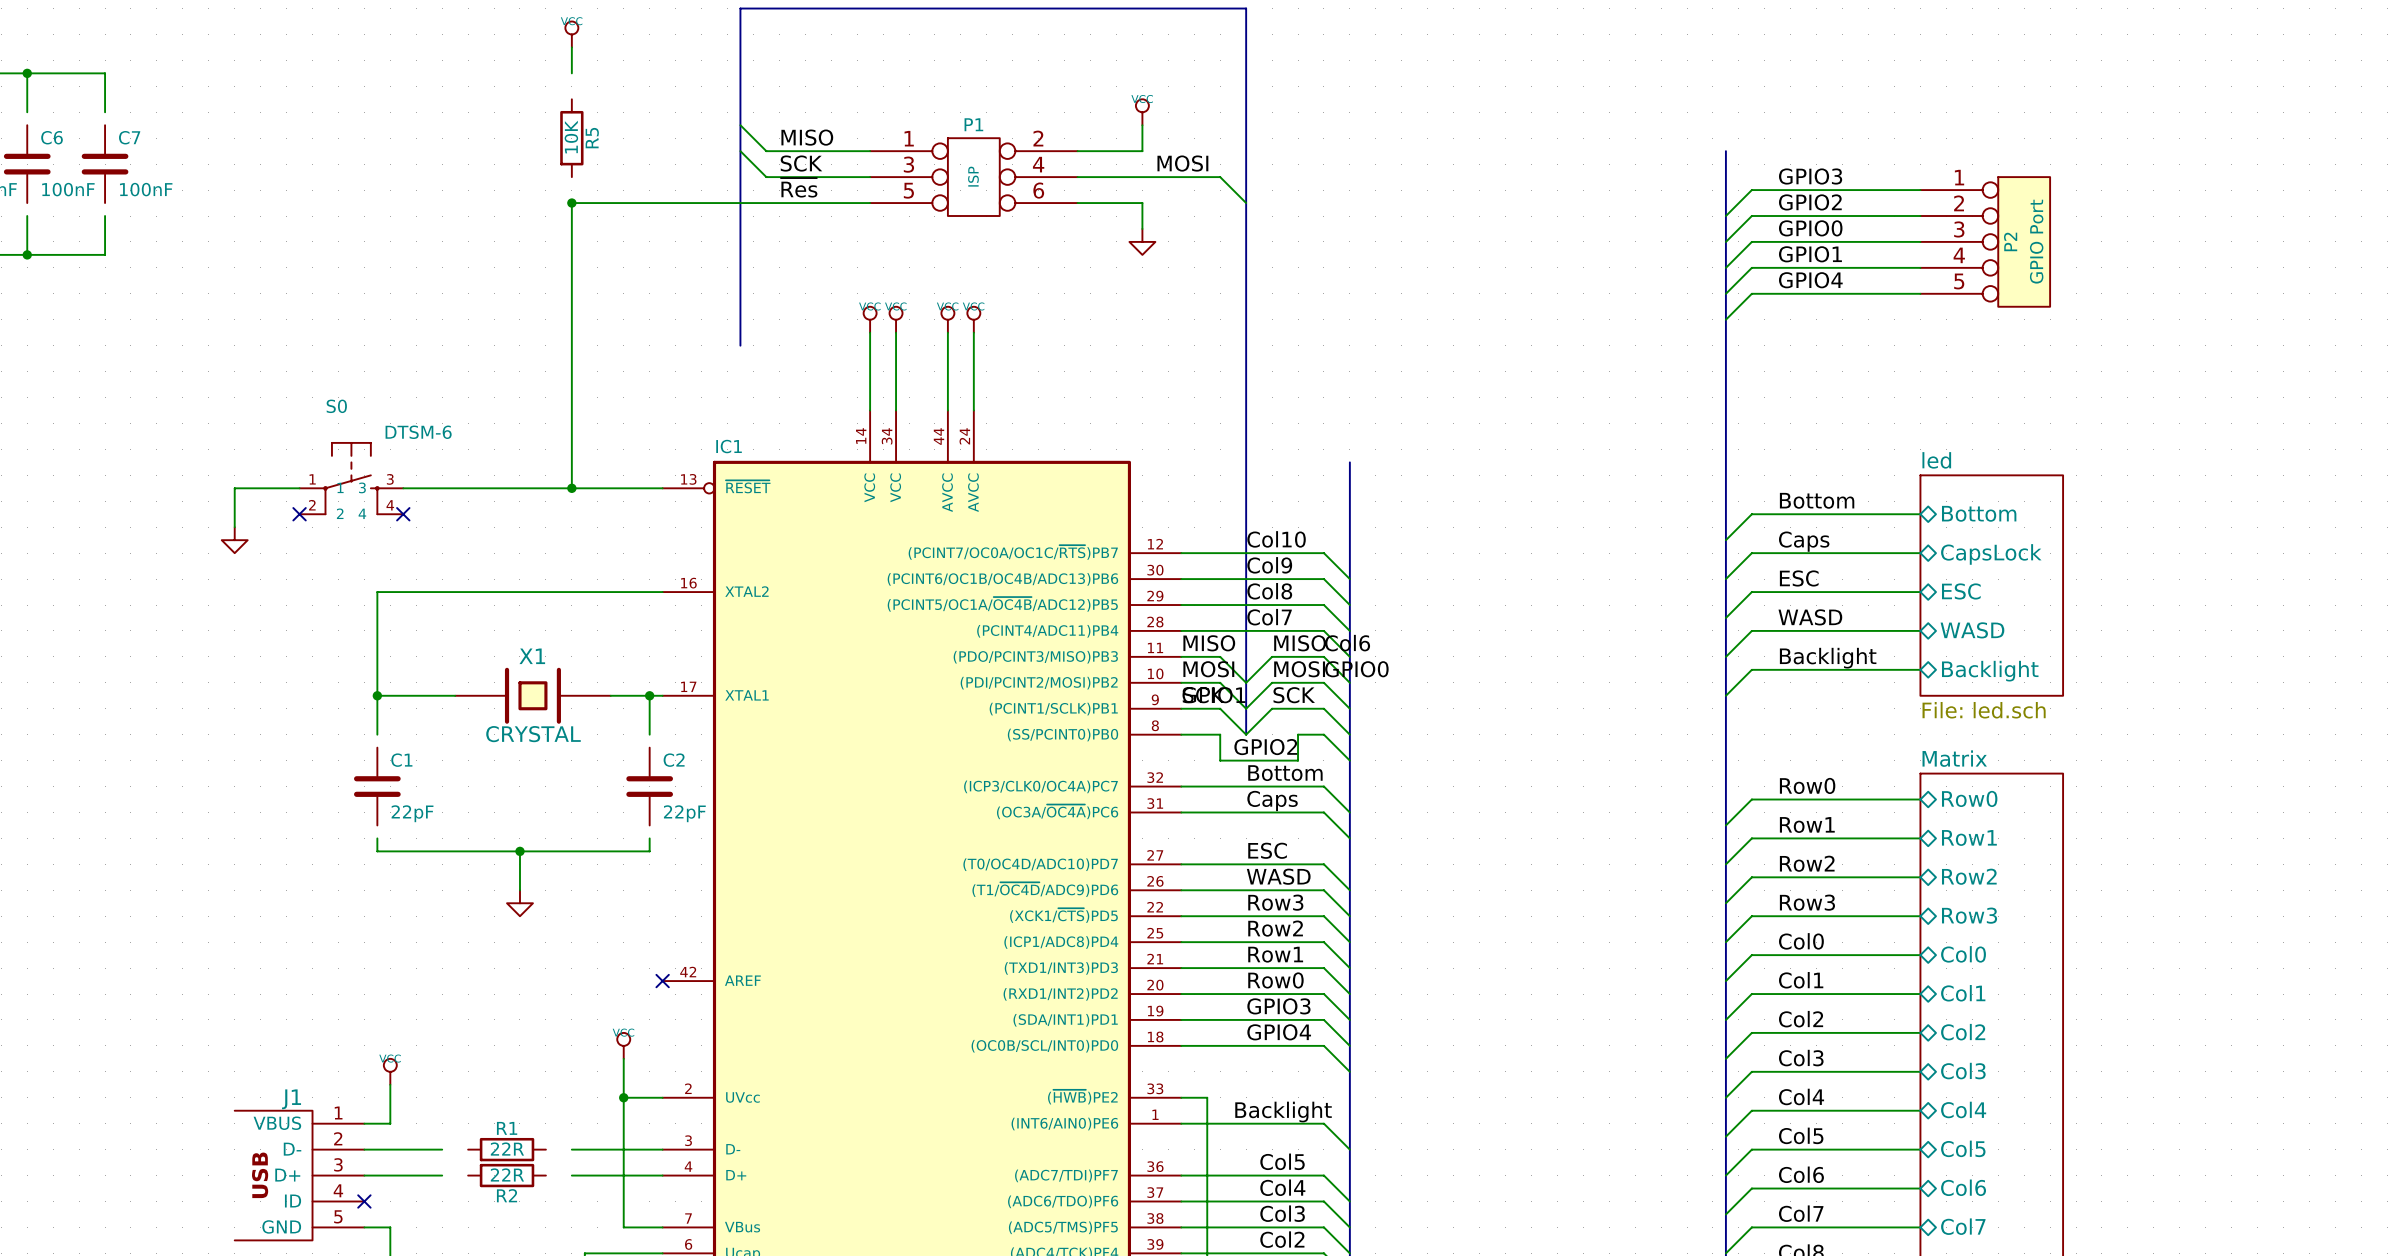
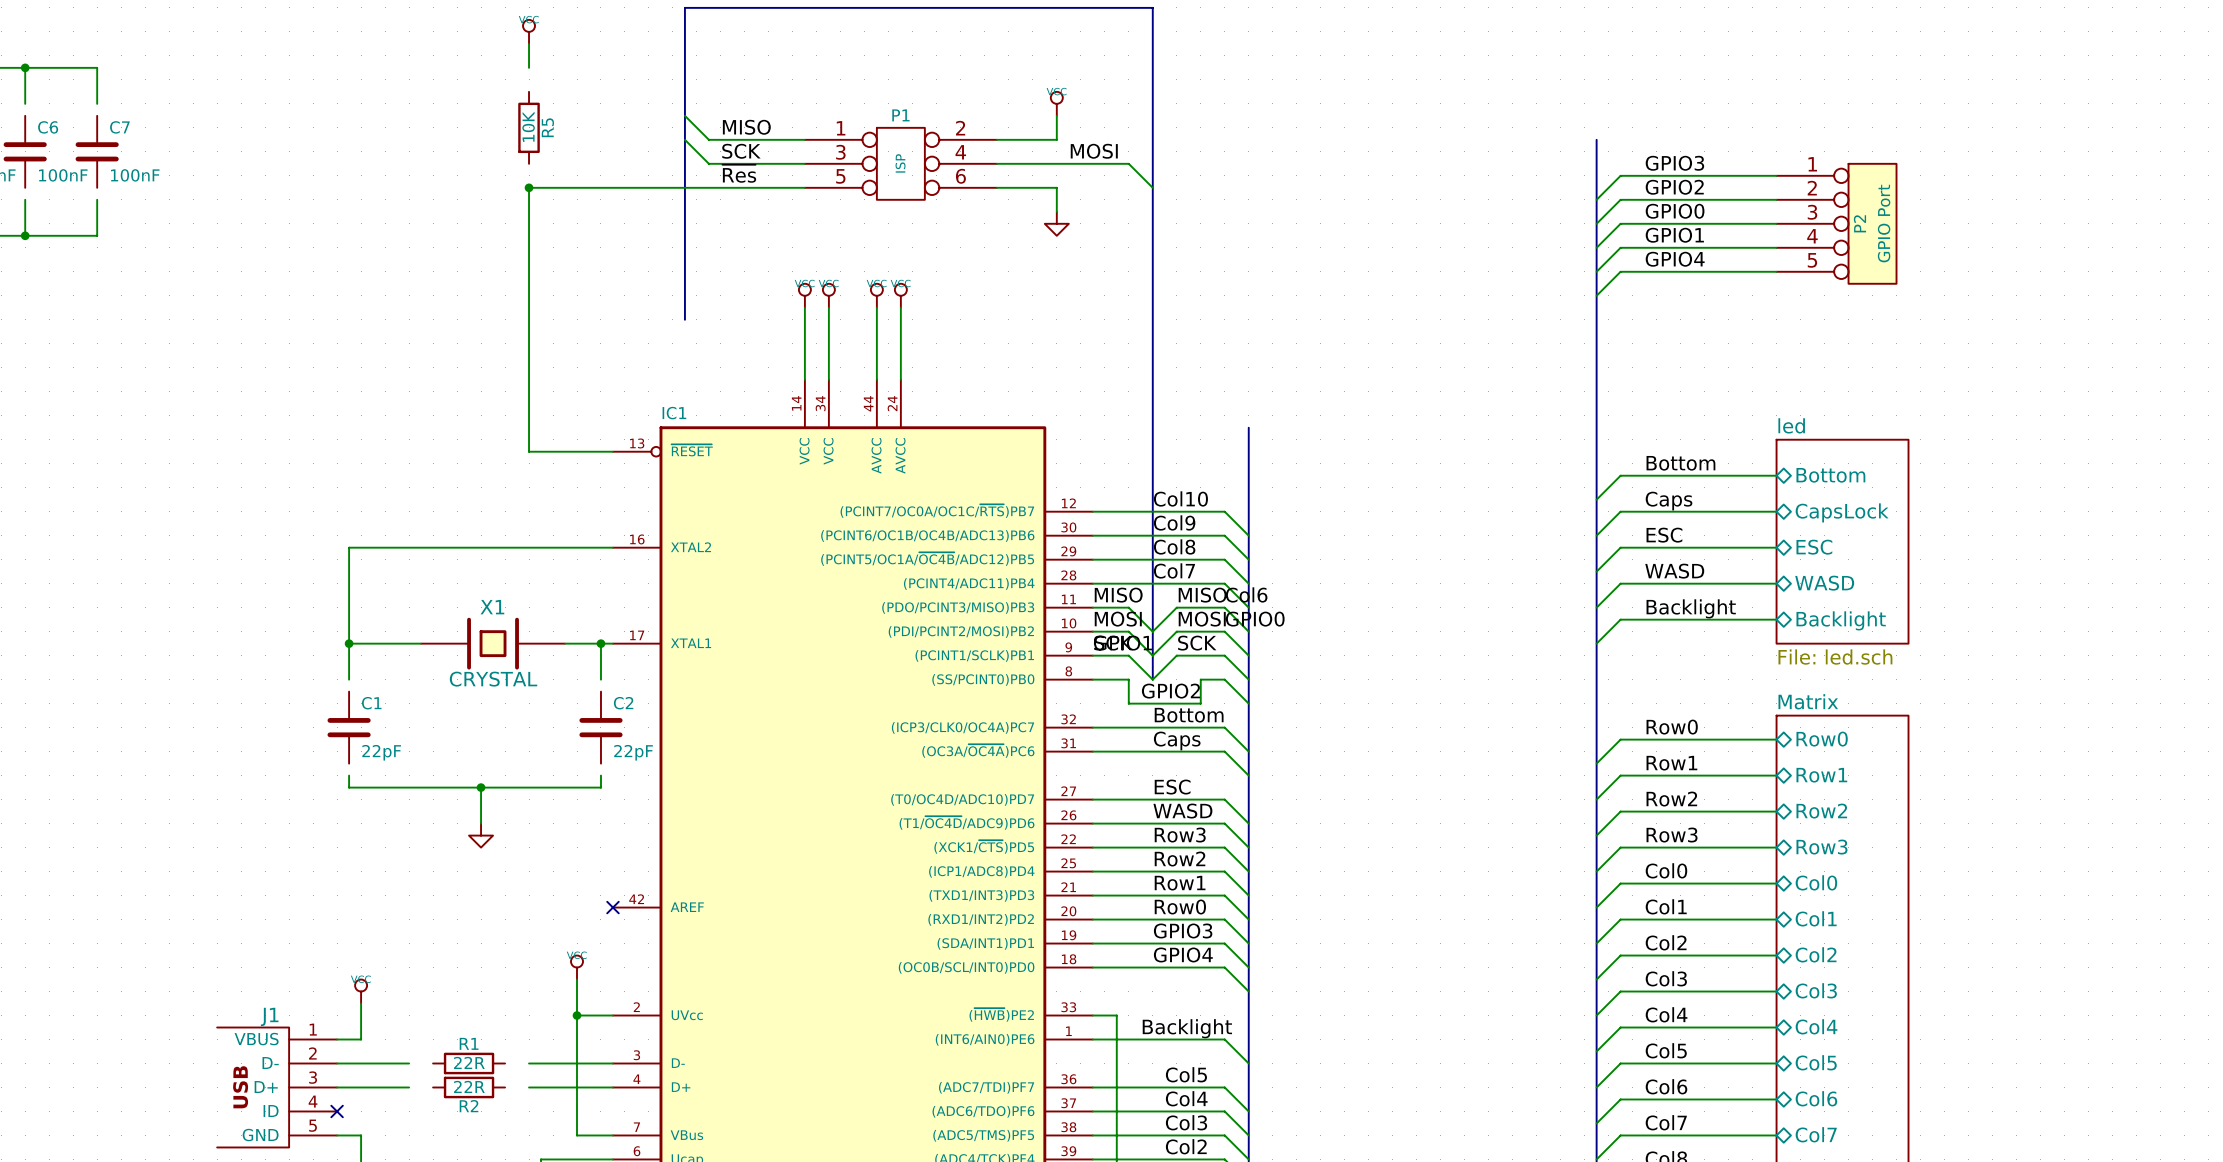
S0: DTSM-6 (351, 478) -> none
wire: (299, 488) (234, 488) (234, 527) -> none
wire: (403, 488) (571, 488) -> none
junction: (571, 488) -> none
no-connect mark: (299, 514) -> none
no-connect mark: (403, 514) -> none
power symbol: (234, 540) -> none

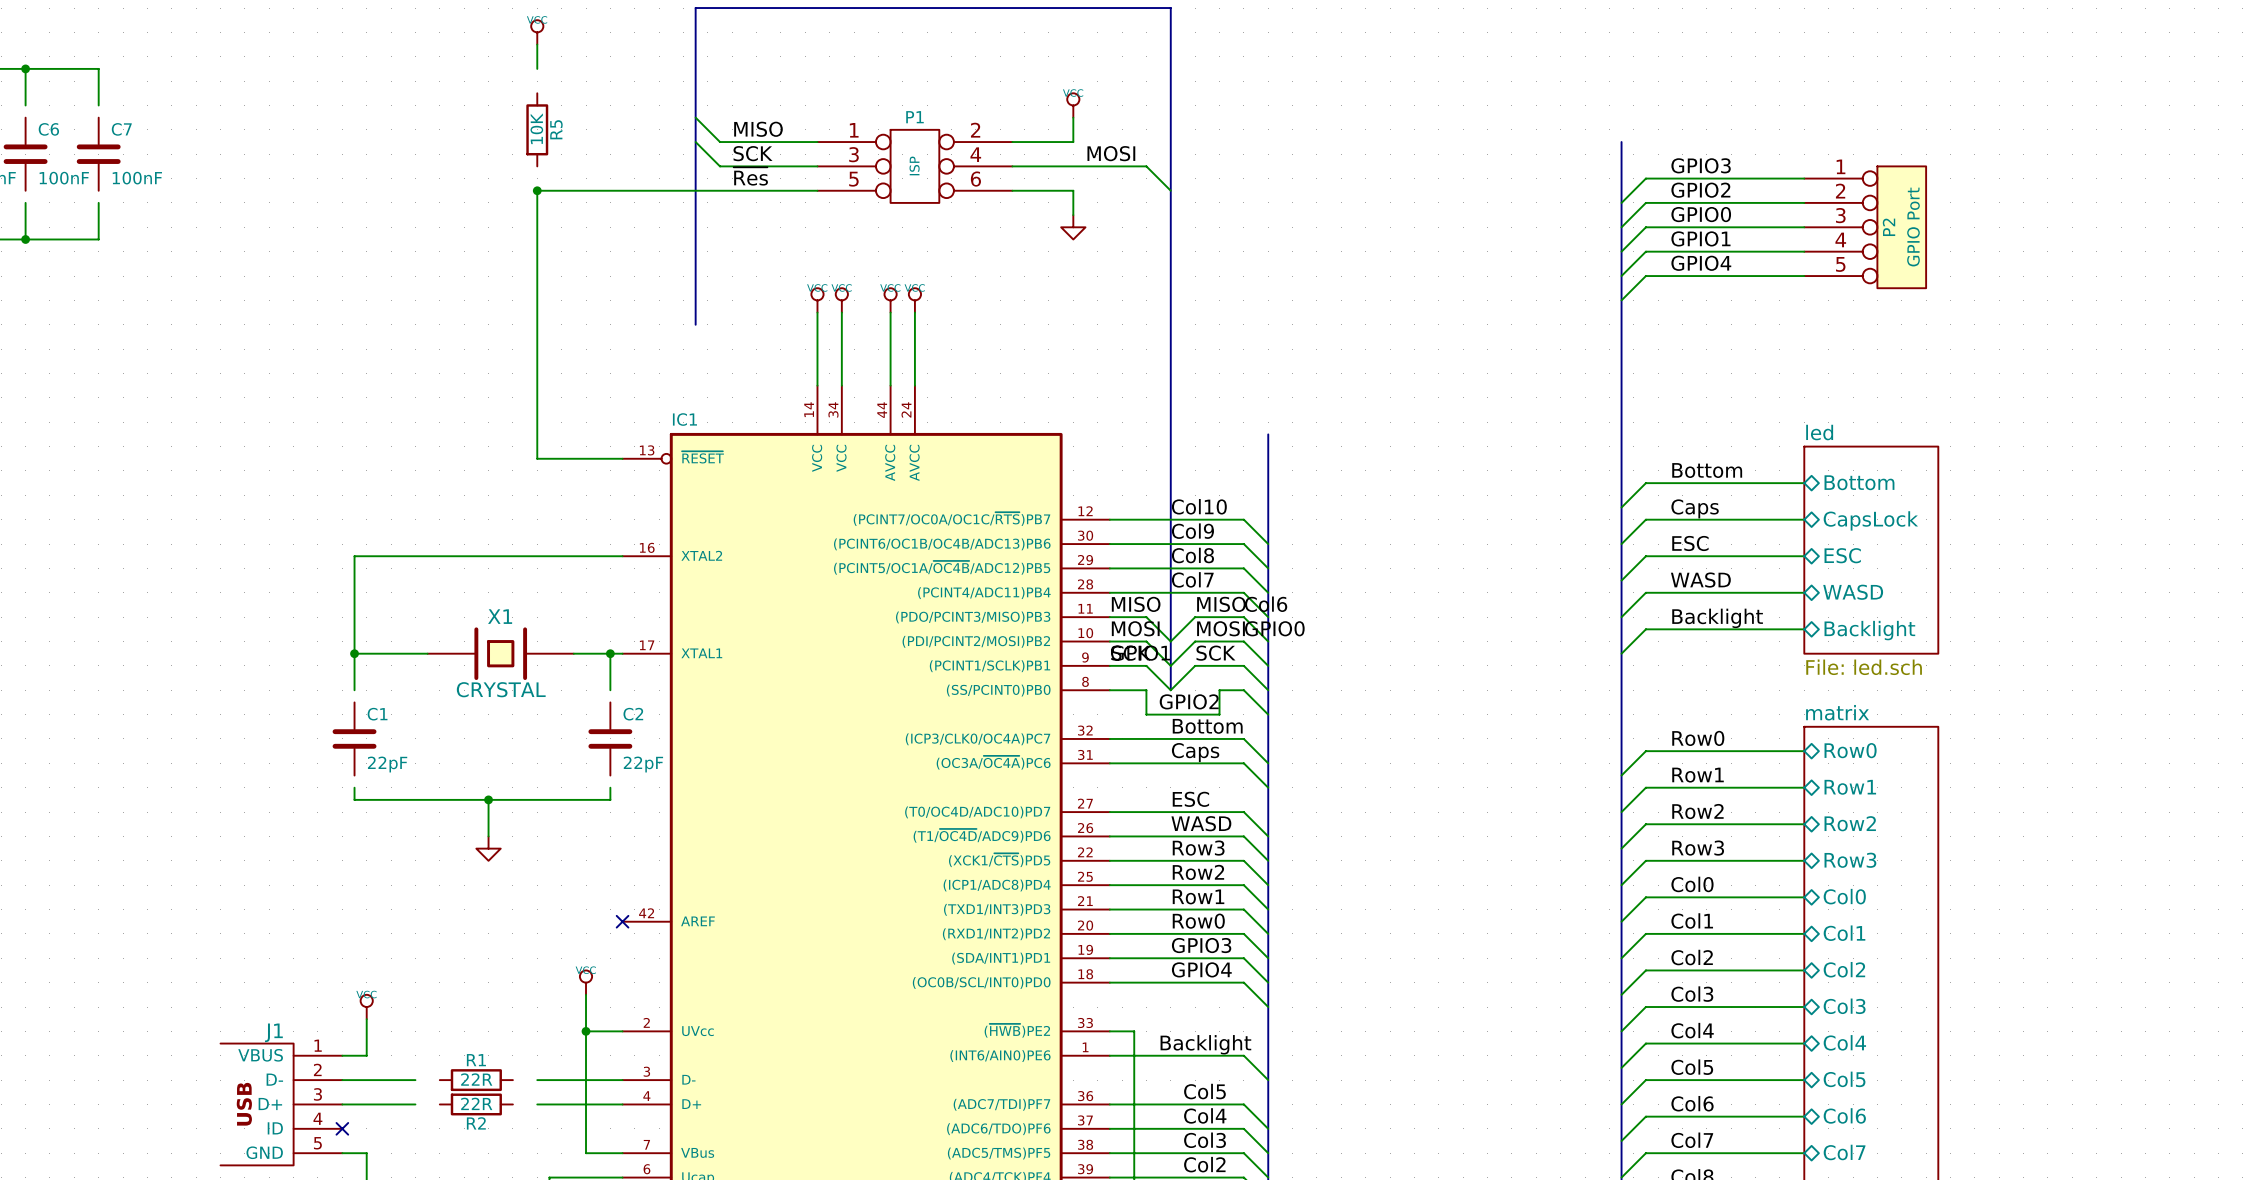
sheet Matrix name: Matrix (1808, 701) -> matrix (1837, 712)

